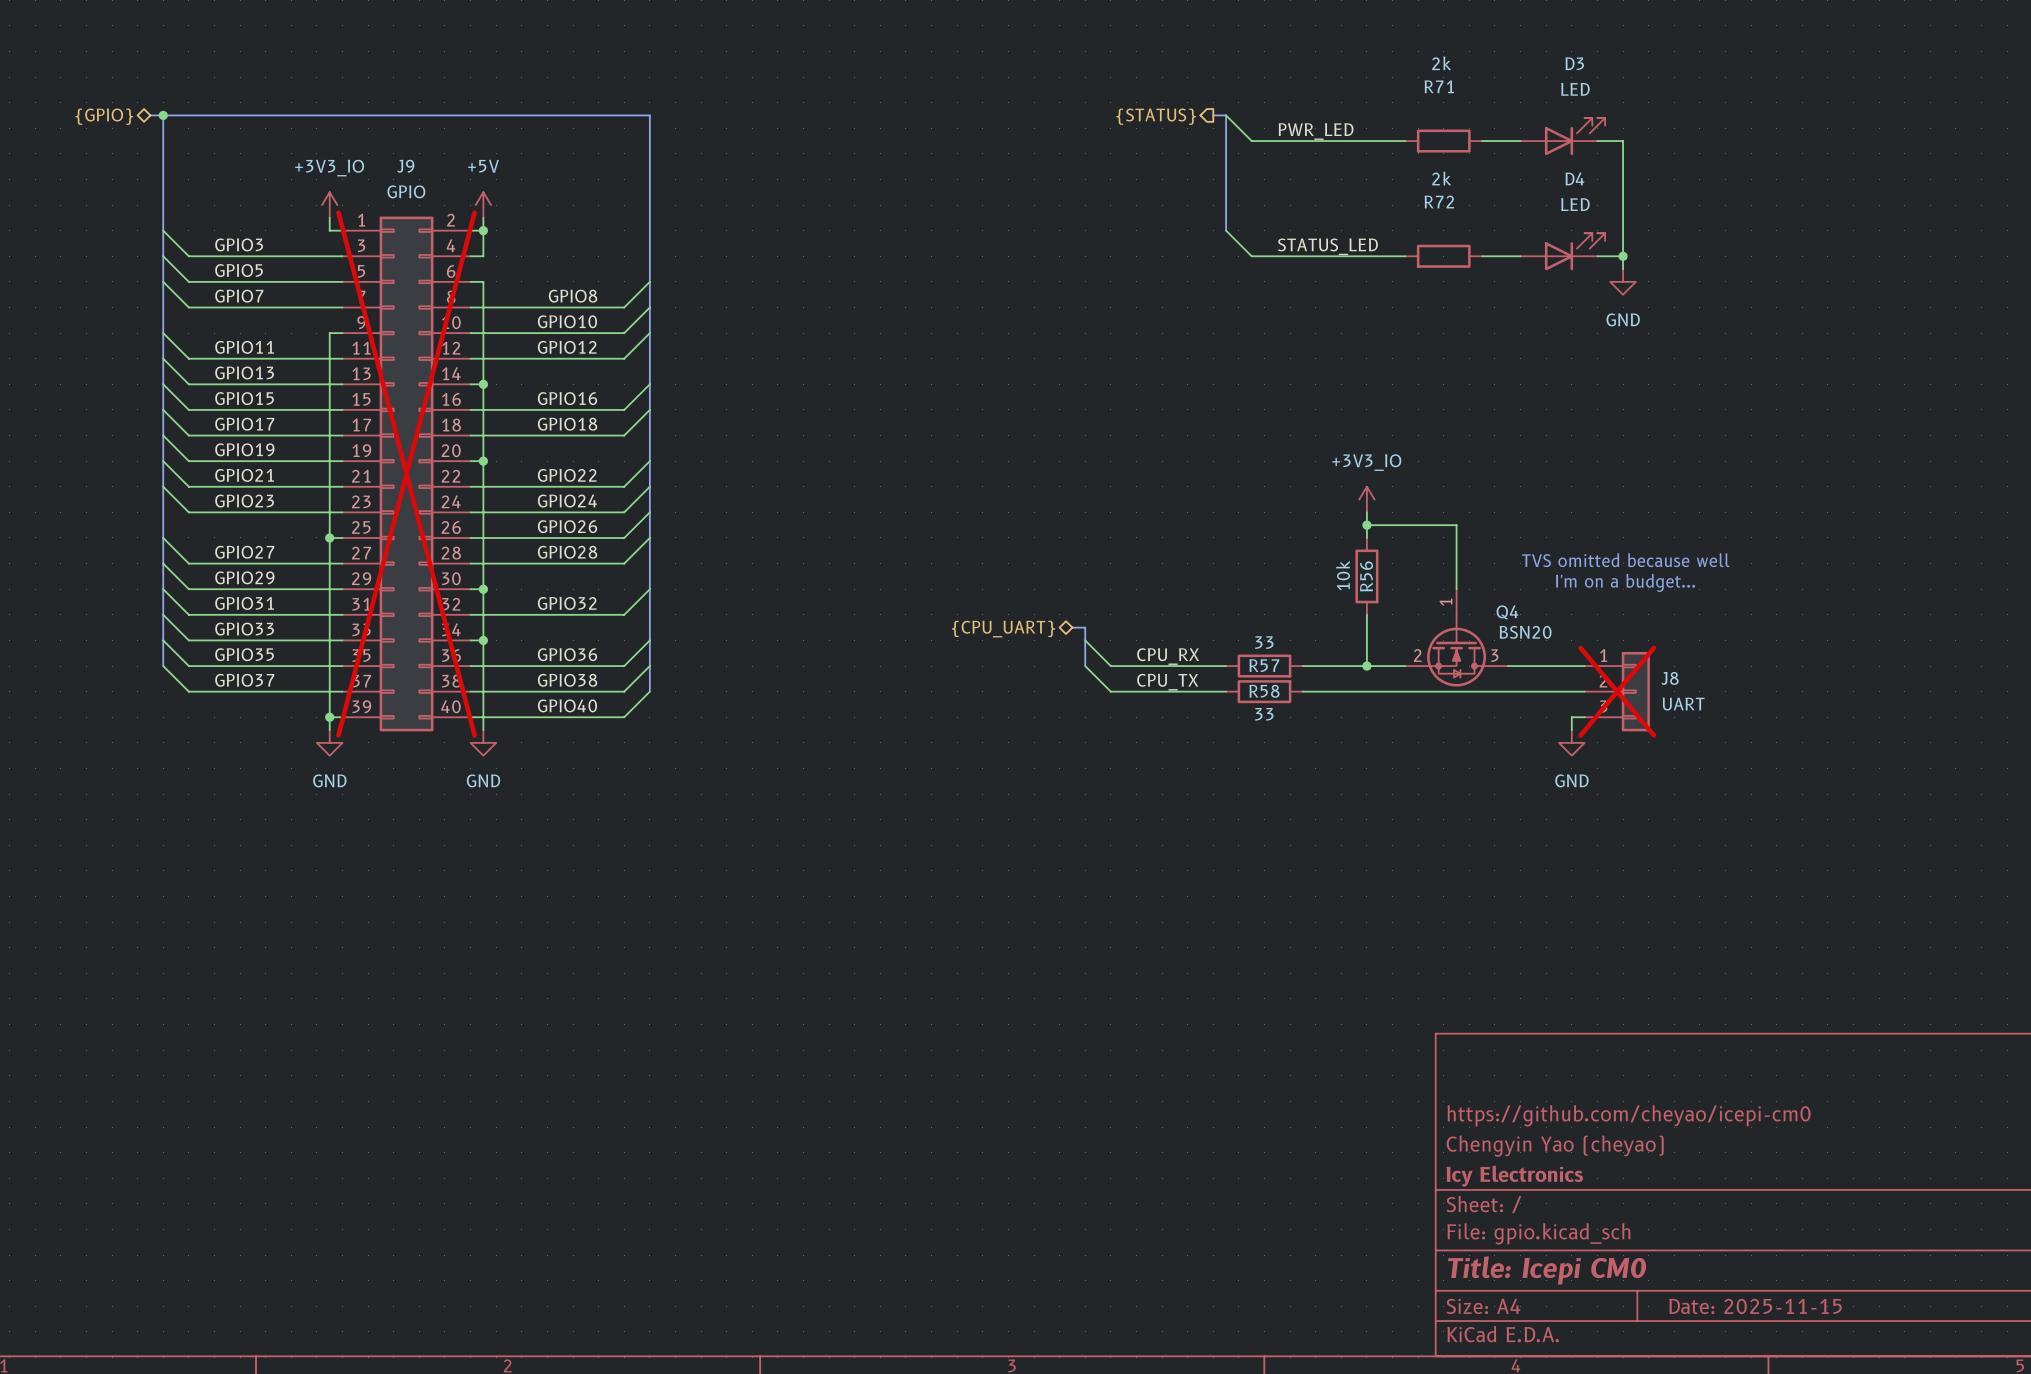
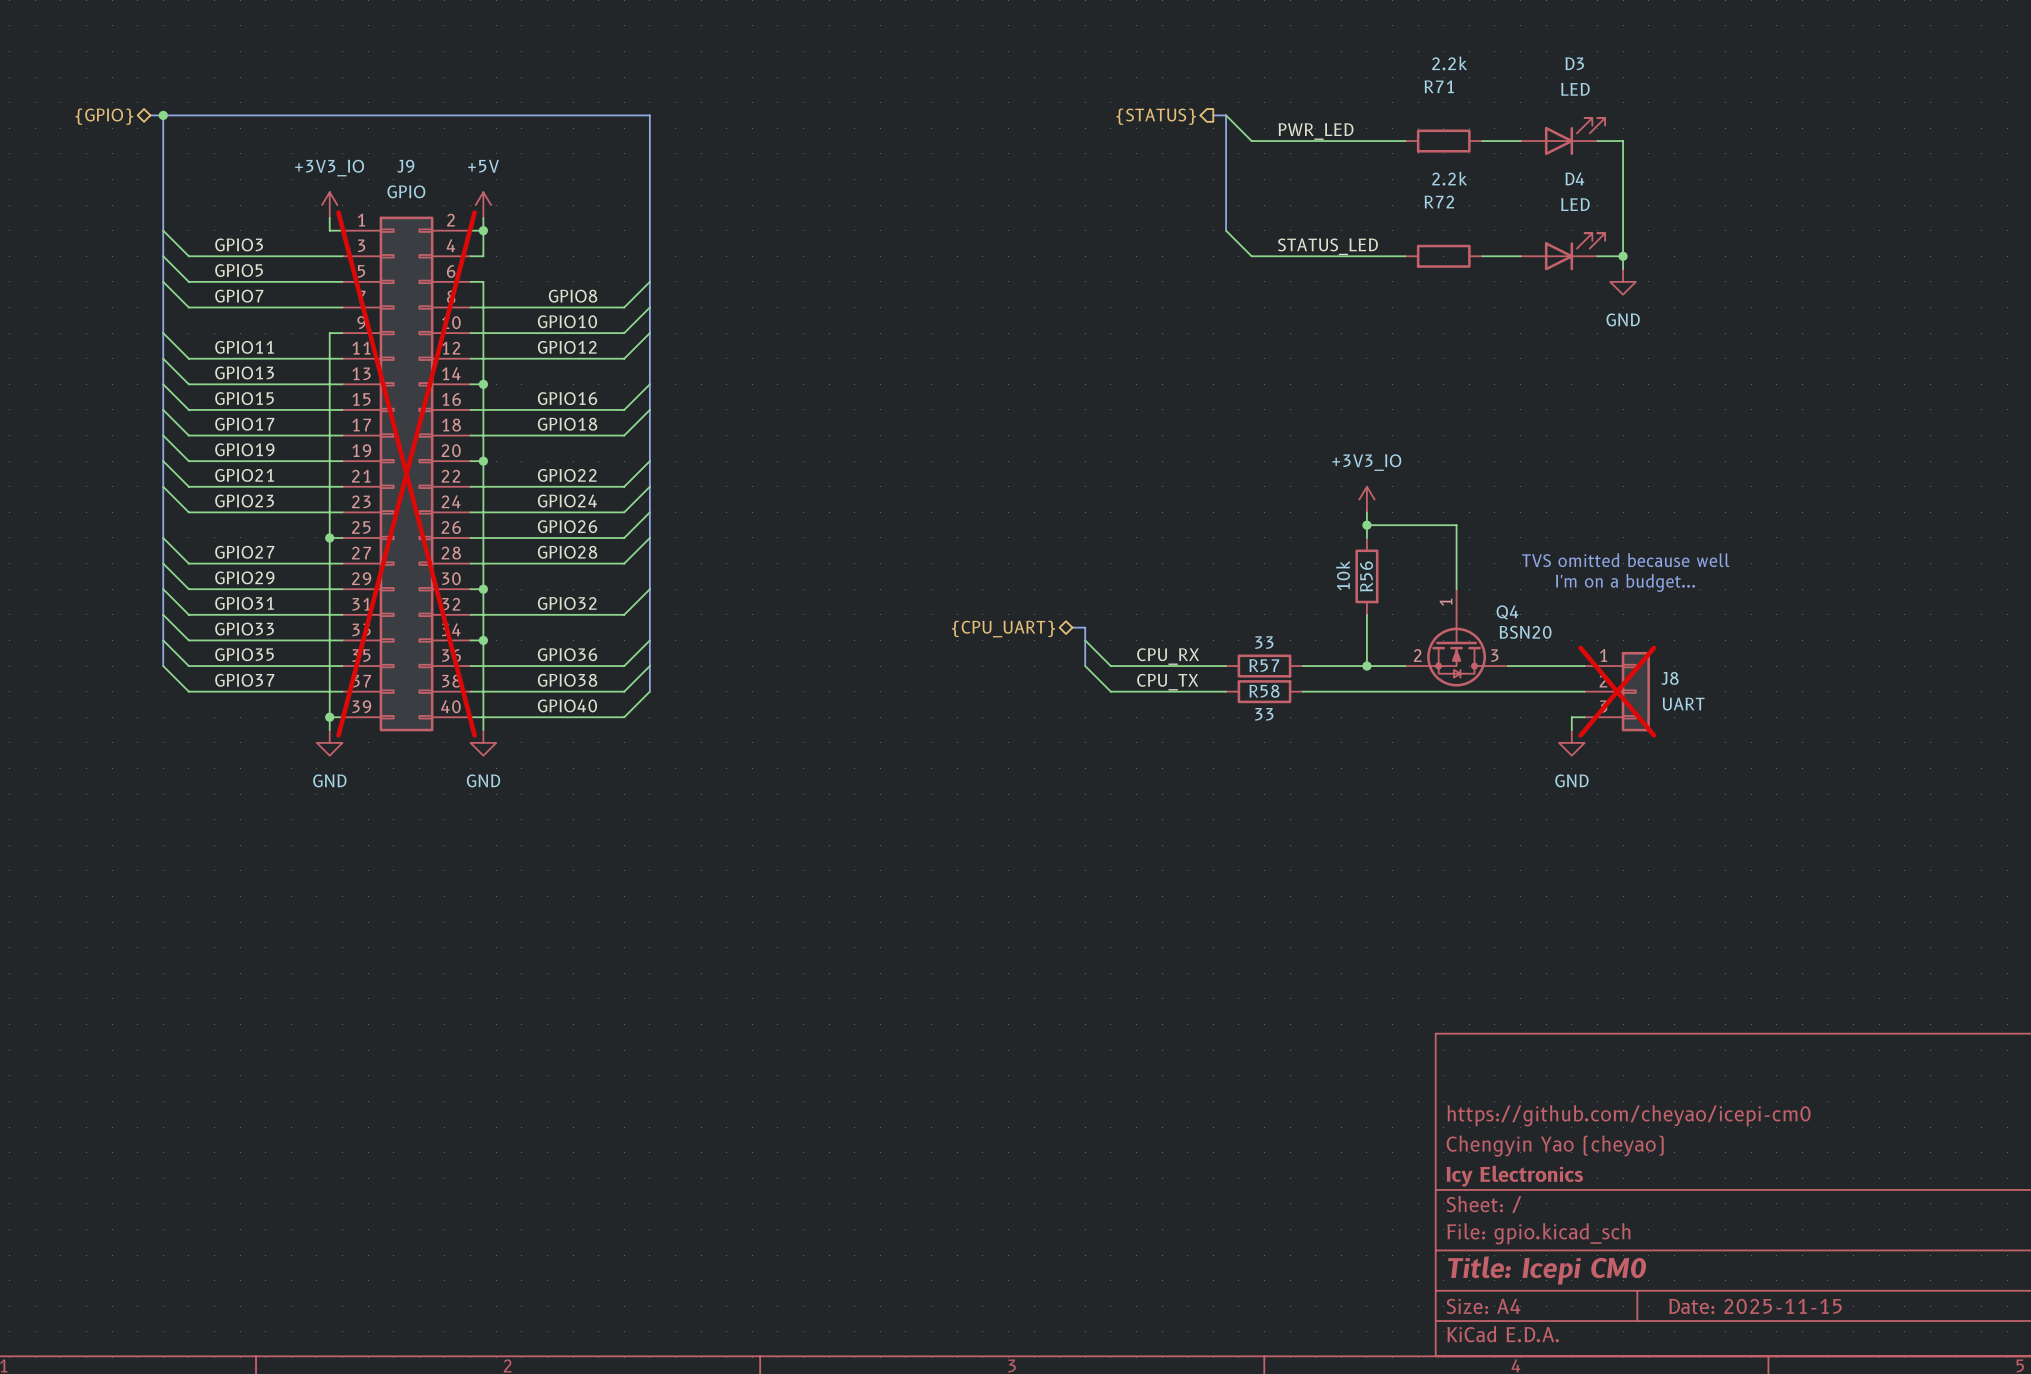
R71 value: 2k (1441, 63) -> 2.2k (1449, 63)
R72 value: 2k (1441, 178) -> 2.2k (1449, 178)

